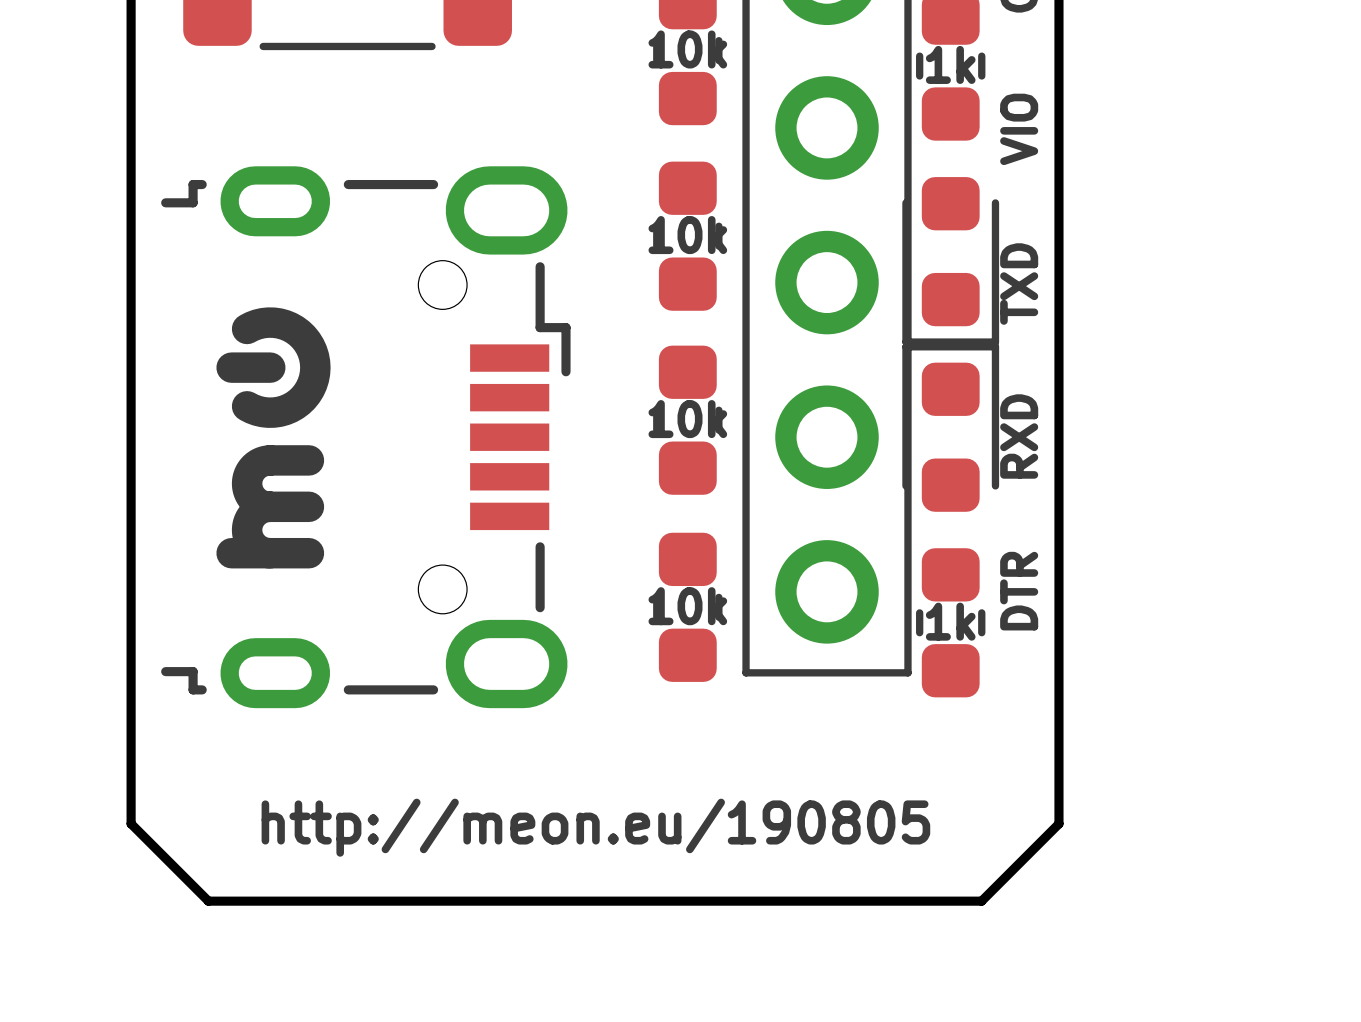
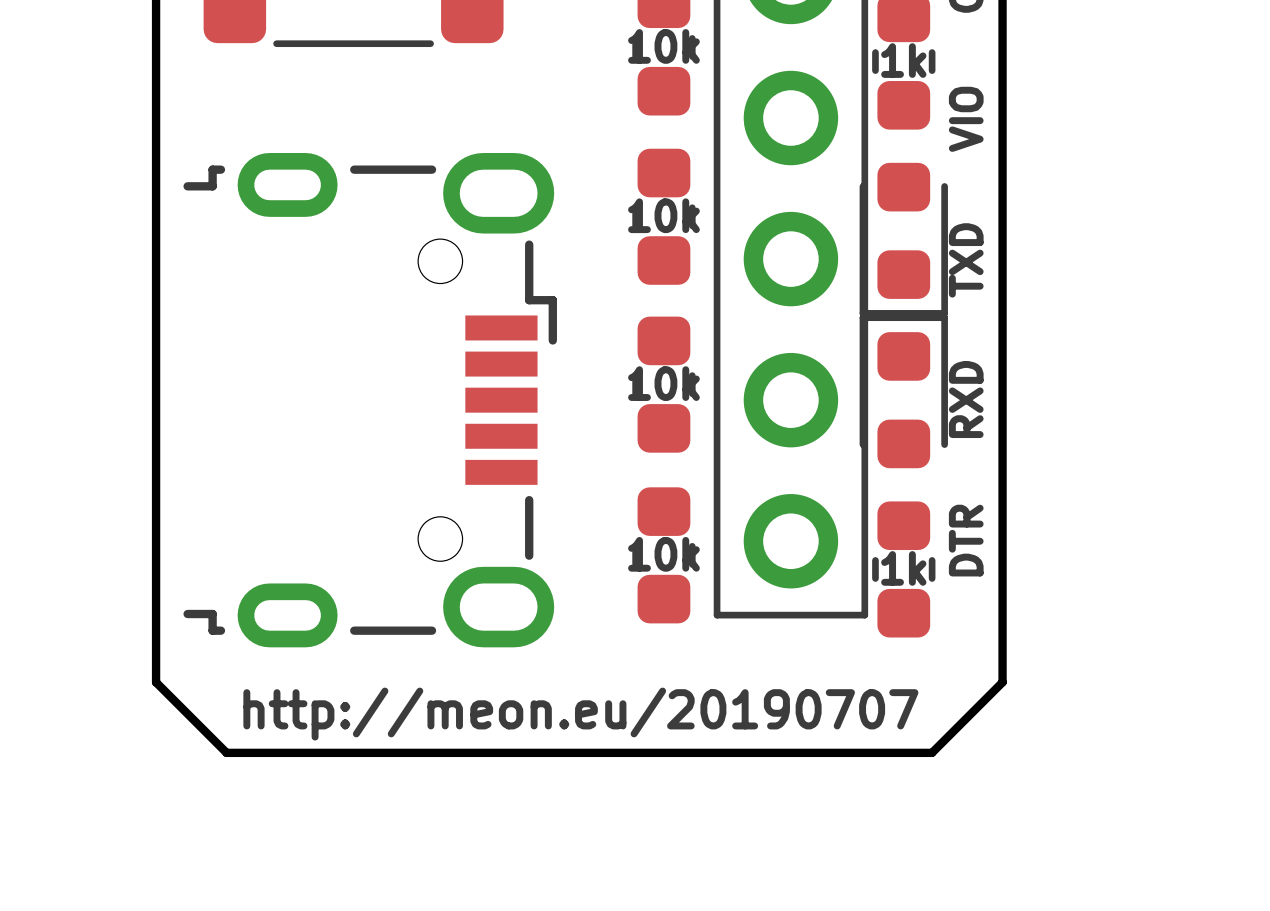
drawing: [216, 307, 331, 569] -> none
board edge: (131, 746) (131, 823) (208, 901) (981, 901) (1058, 823) (1058, 746) -> (156, 682) (226, 752) (932, 752) (1002, 682)
text: http://meon.eu/190805 (595, 827) -> http://meon.eu/20190707 (580, 714)

